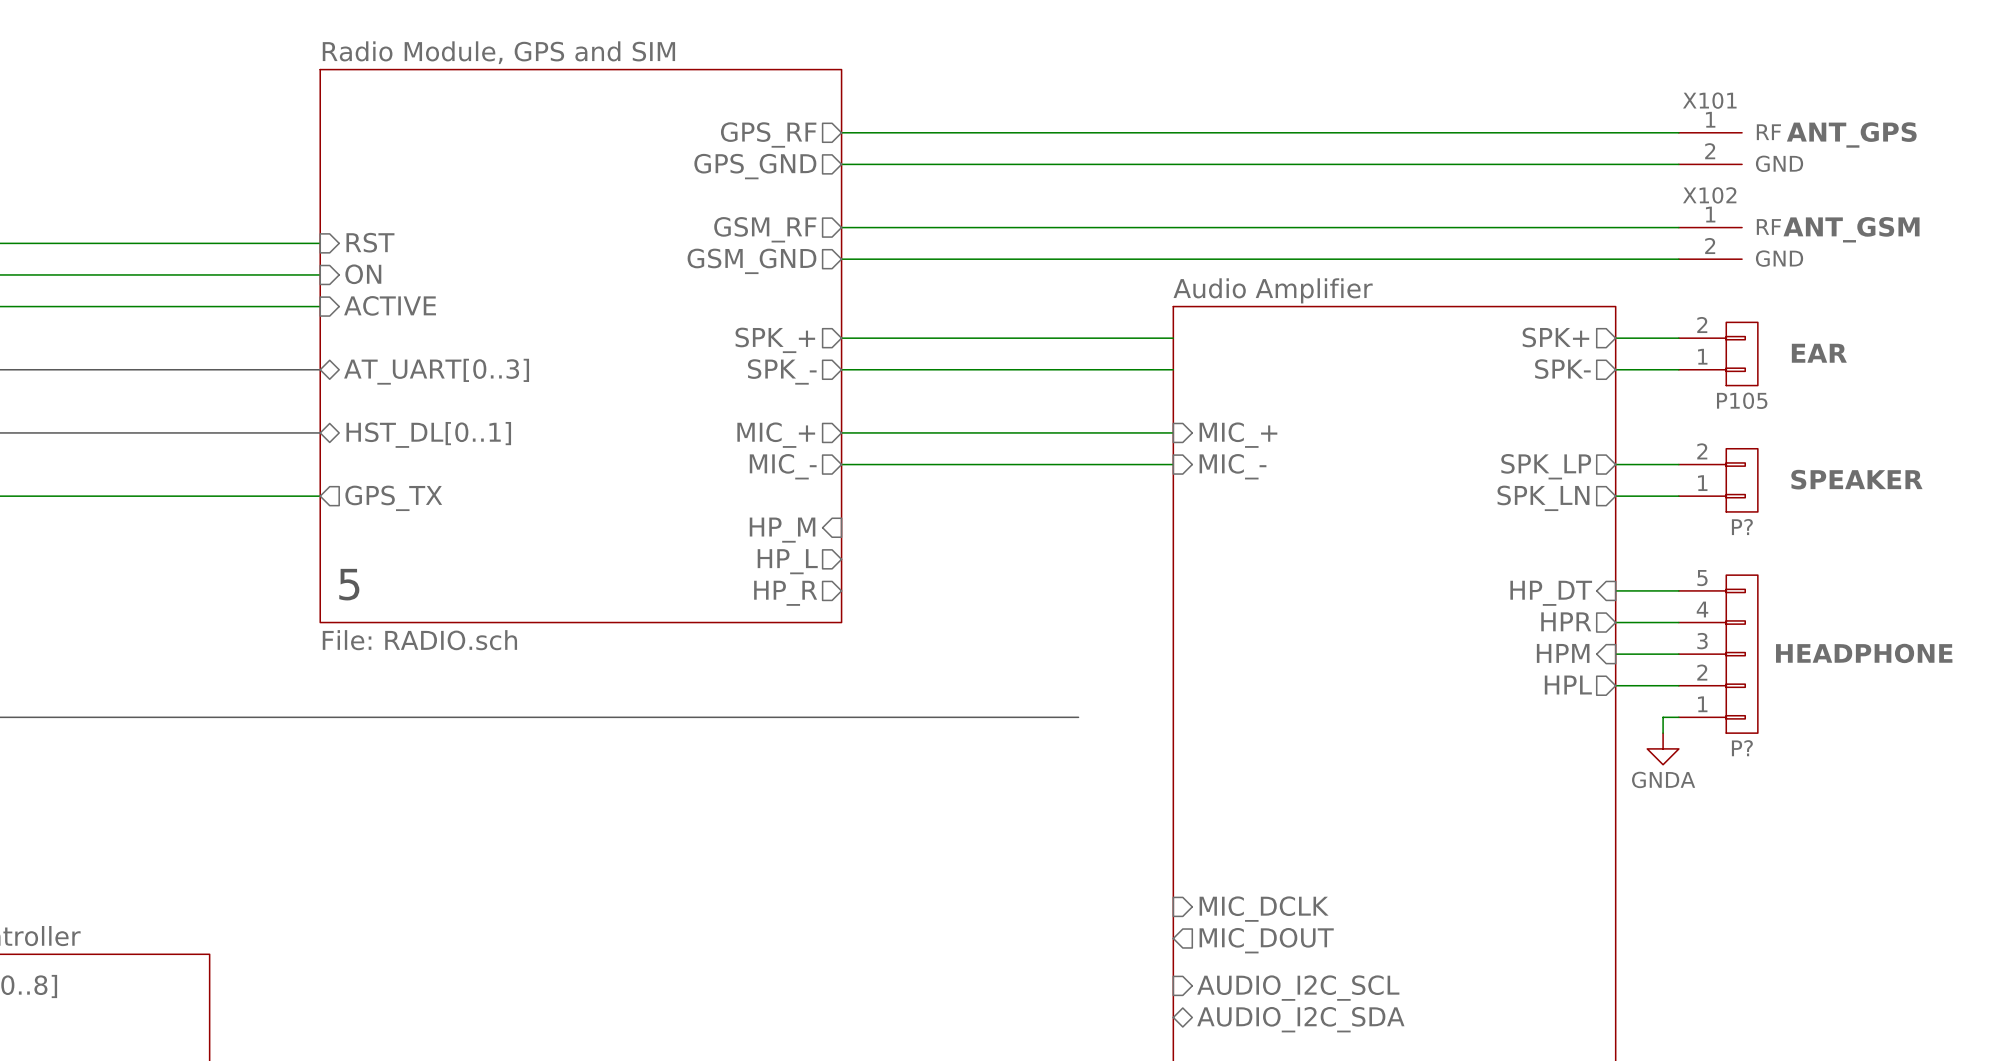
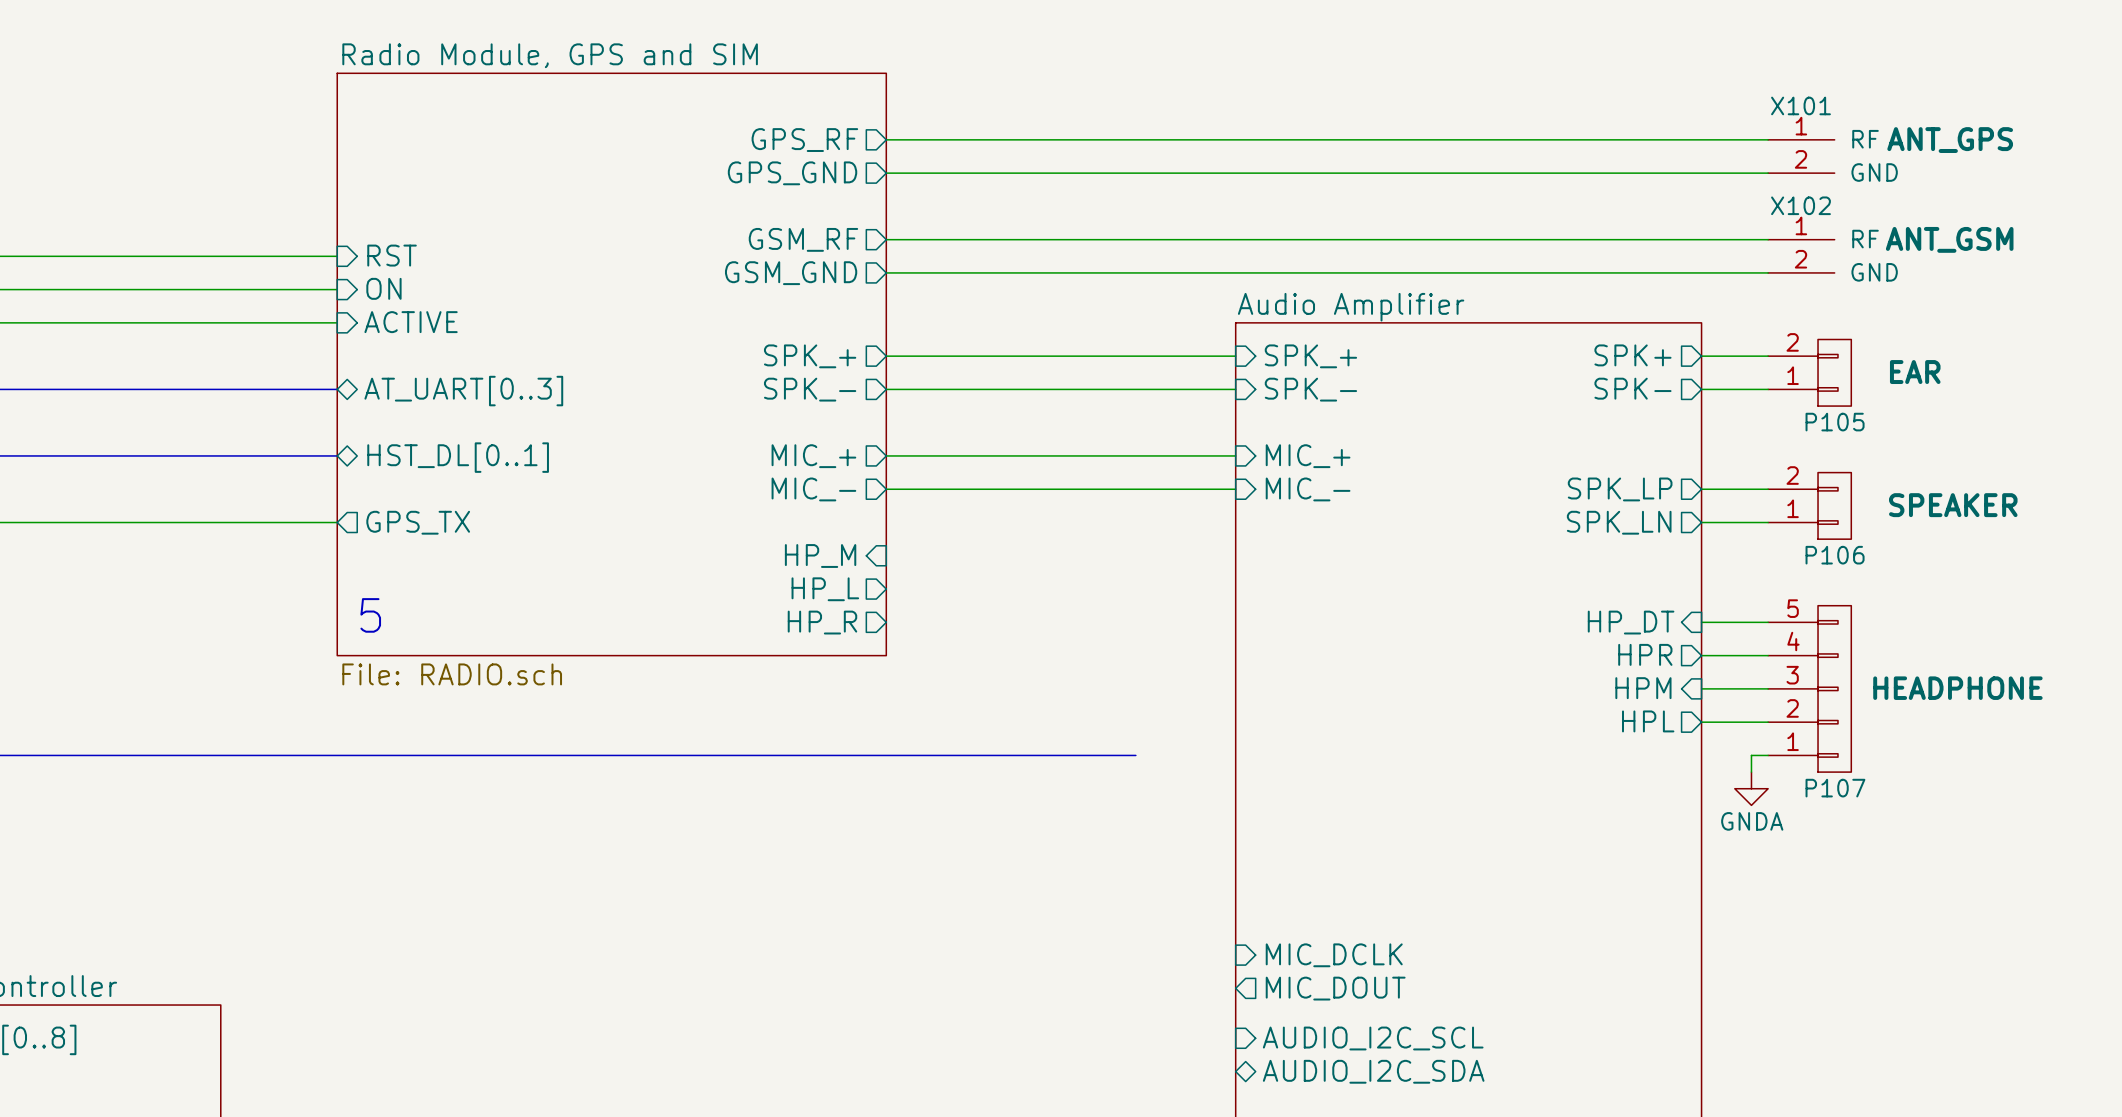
sheet pin: none -> SPK_+ (1310, 356)
sheet pin: none -> SPK_- (1310, 389)
P? name: P? (1742, 527) -> P106 (1835, 555)
P? name: P? (1742, 748) -> P107 (1835, 788)

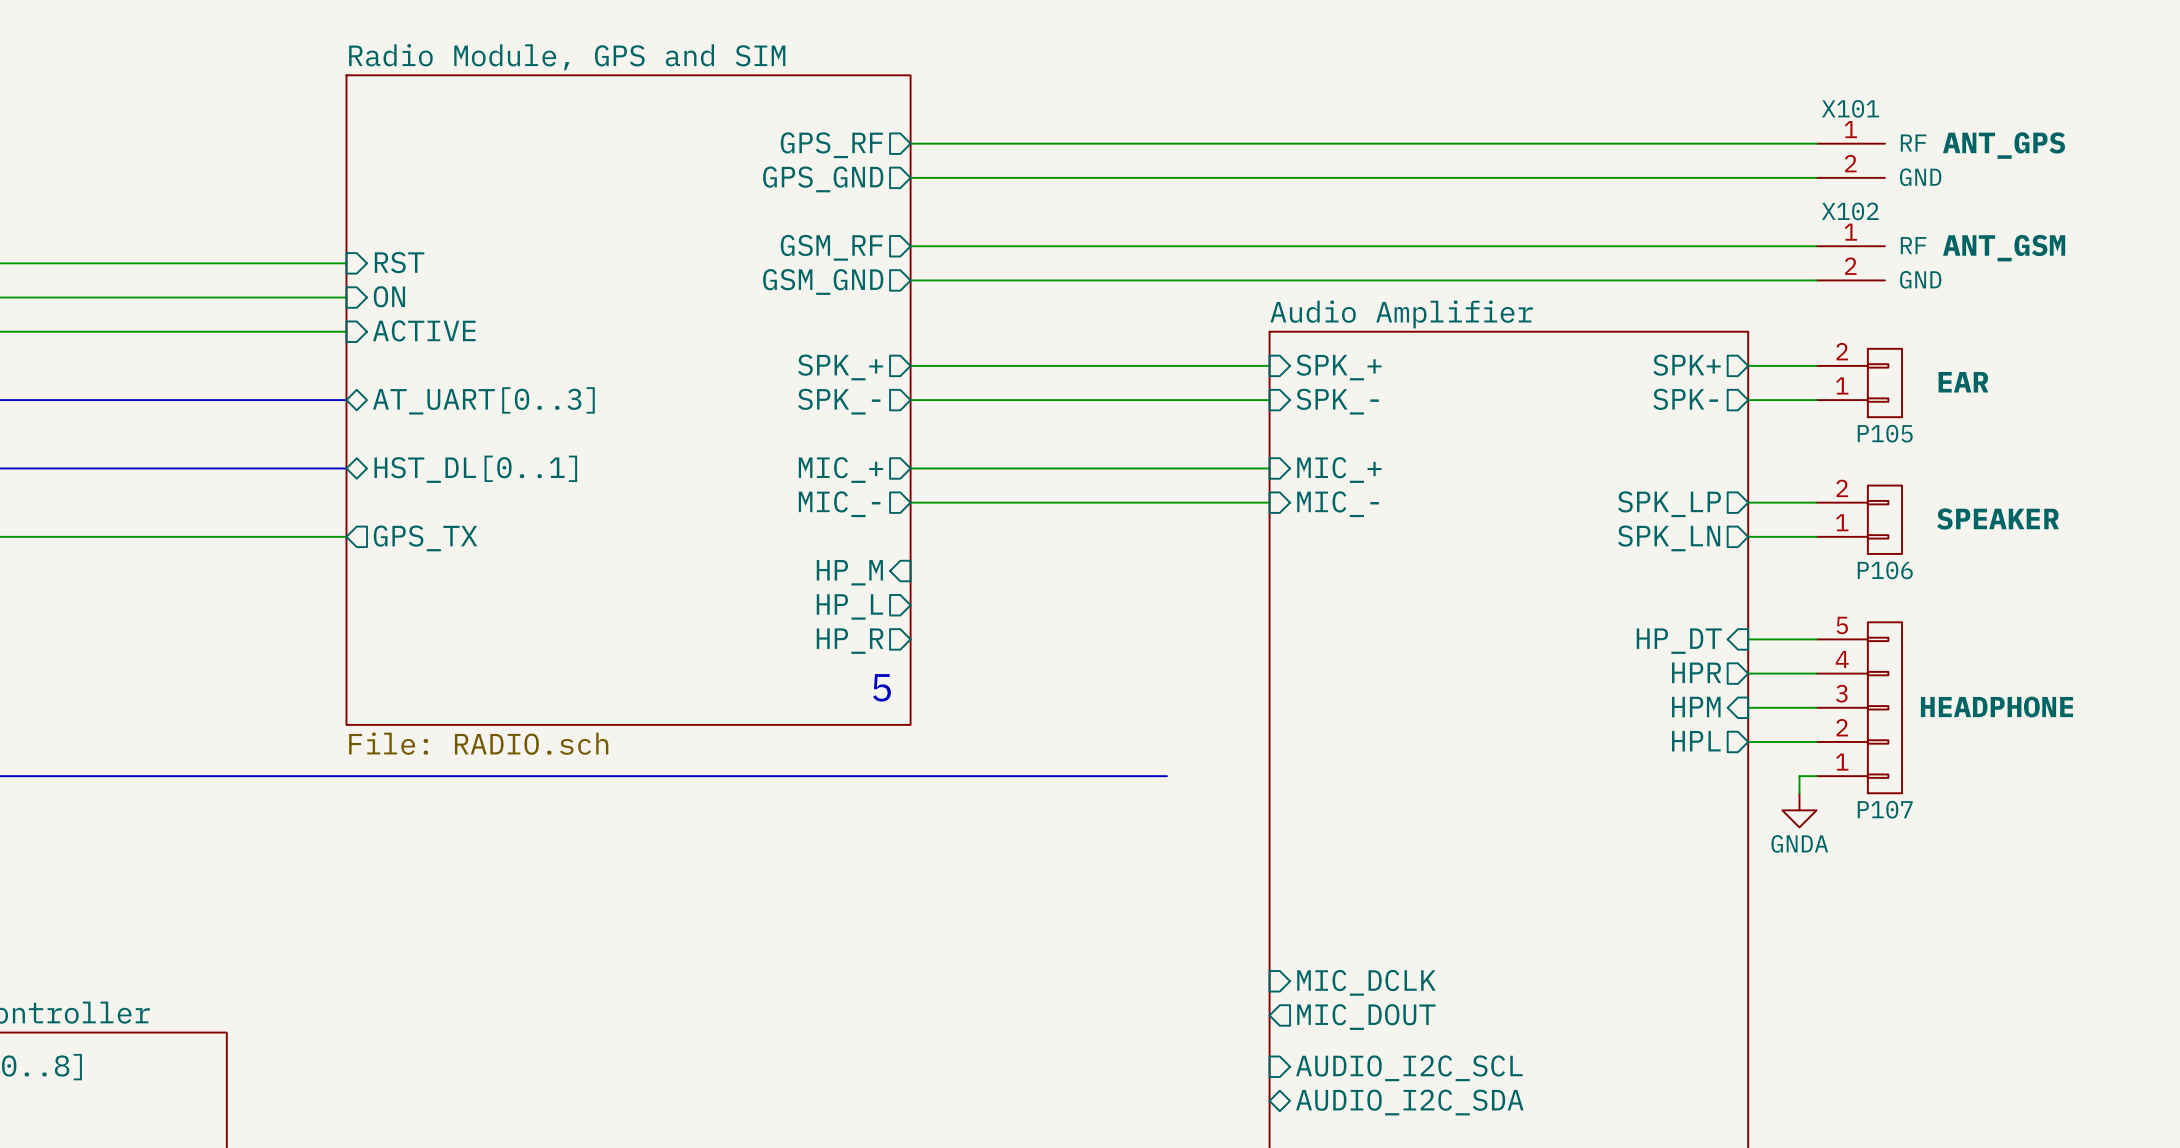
sheet Radio Module, GPS and SIM: File: RADIO.sch (611, 364) -> none
sheet Radio Module, GPS and SIM: none -> File: RADIO.sch (628, 400)
text: 5 (370, 615) -> none
text: none -> 5 (882, 687)

